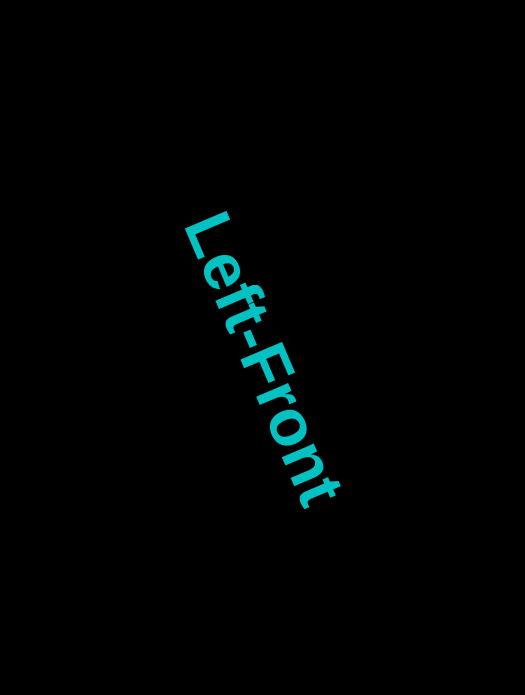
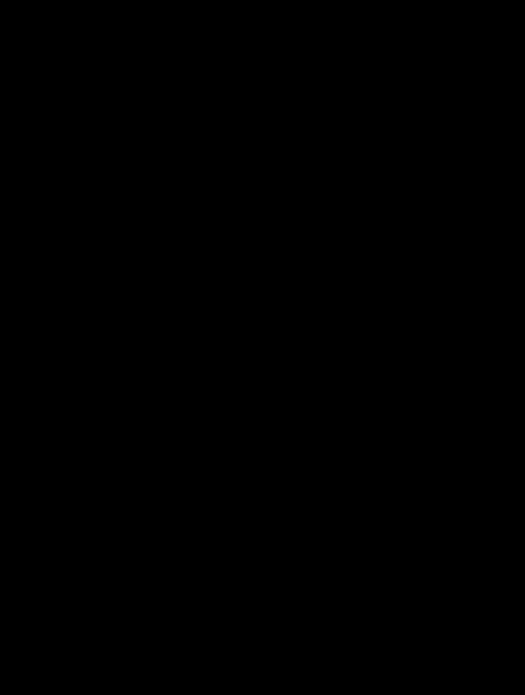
text: Left-Front (262, 359) -> none

